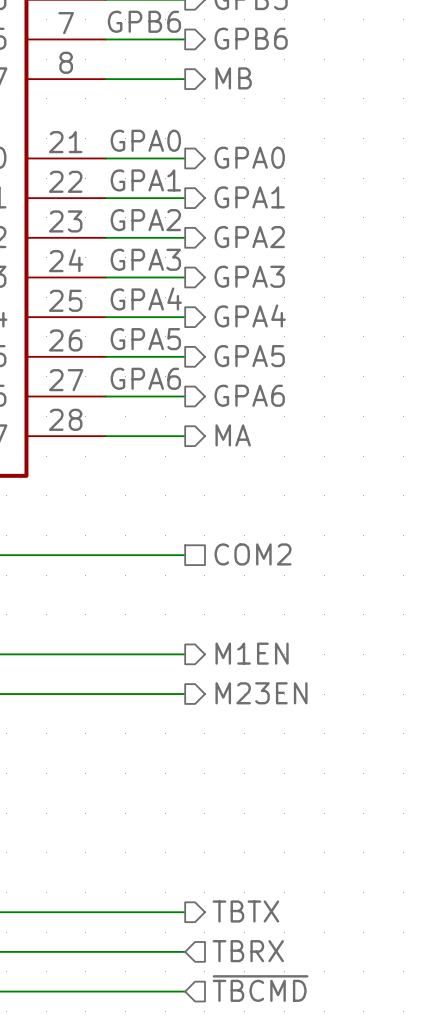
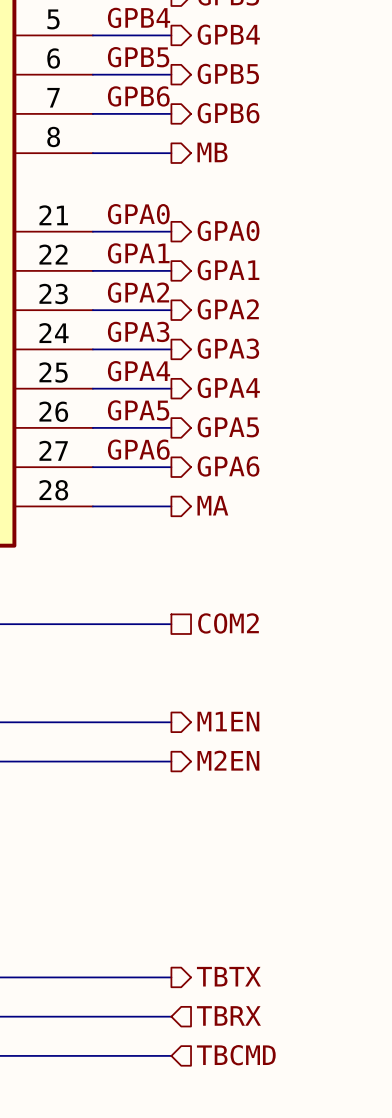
hierarchical label: M23EN (261, 693) -> M2EN (228, 760)
hierarchical label: ~{TBCMD} (260, 988) -> TBCMD (236, 1055)

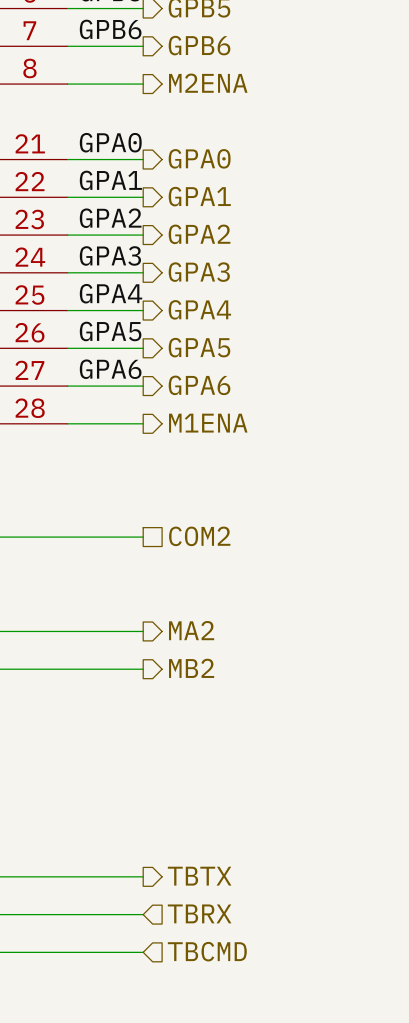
hierarchical label: MB (212, 152) -> M2ENA (208, 83)
hierarchical label: MA (212, 505) -> M1ENA (208, 423)
hierarchical label: M1EN (228, 721) -> MA2 (191, 630)
hierarchical label: M2EN (228, 760) -> MB2 (191, 668)

